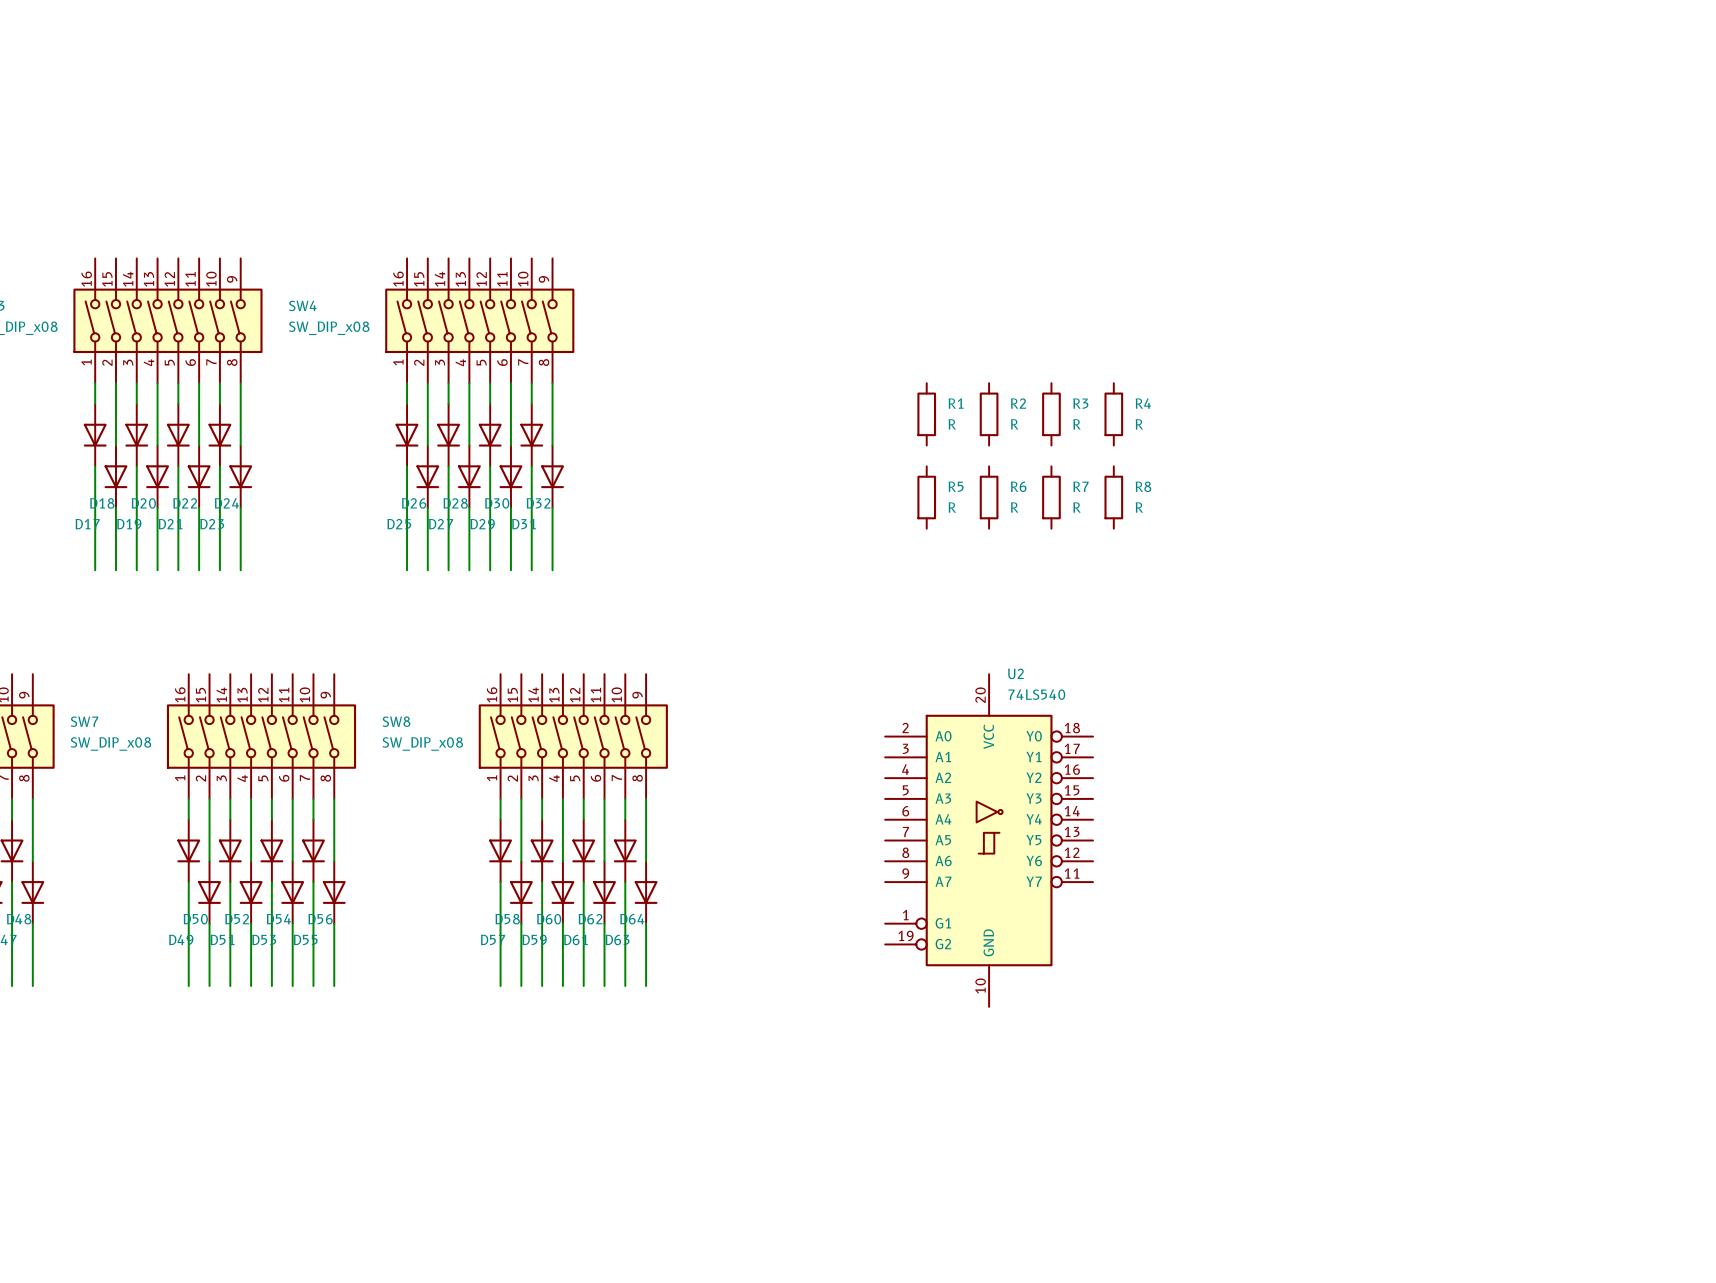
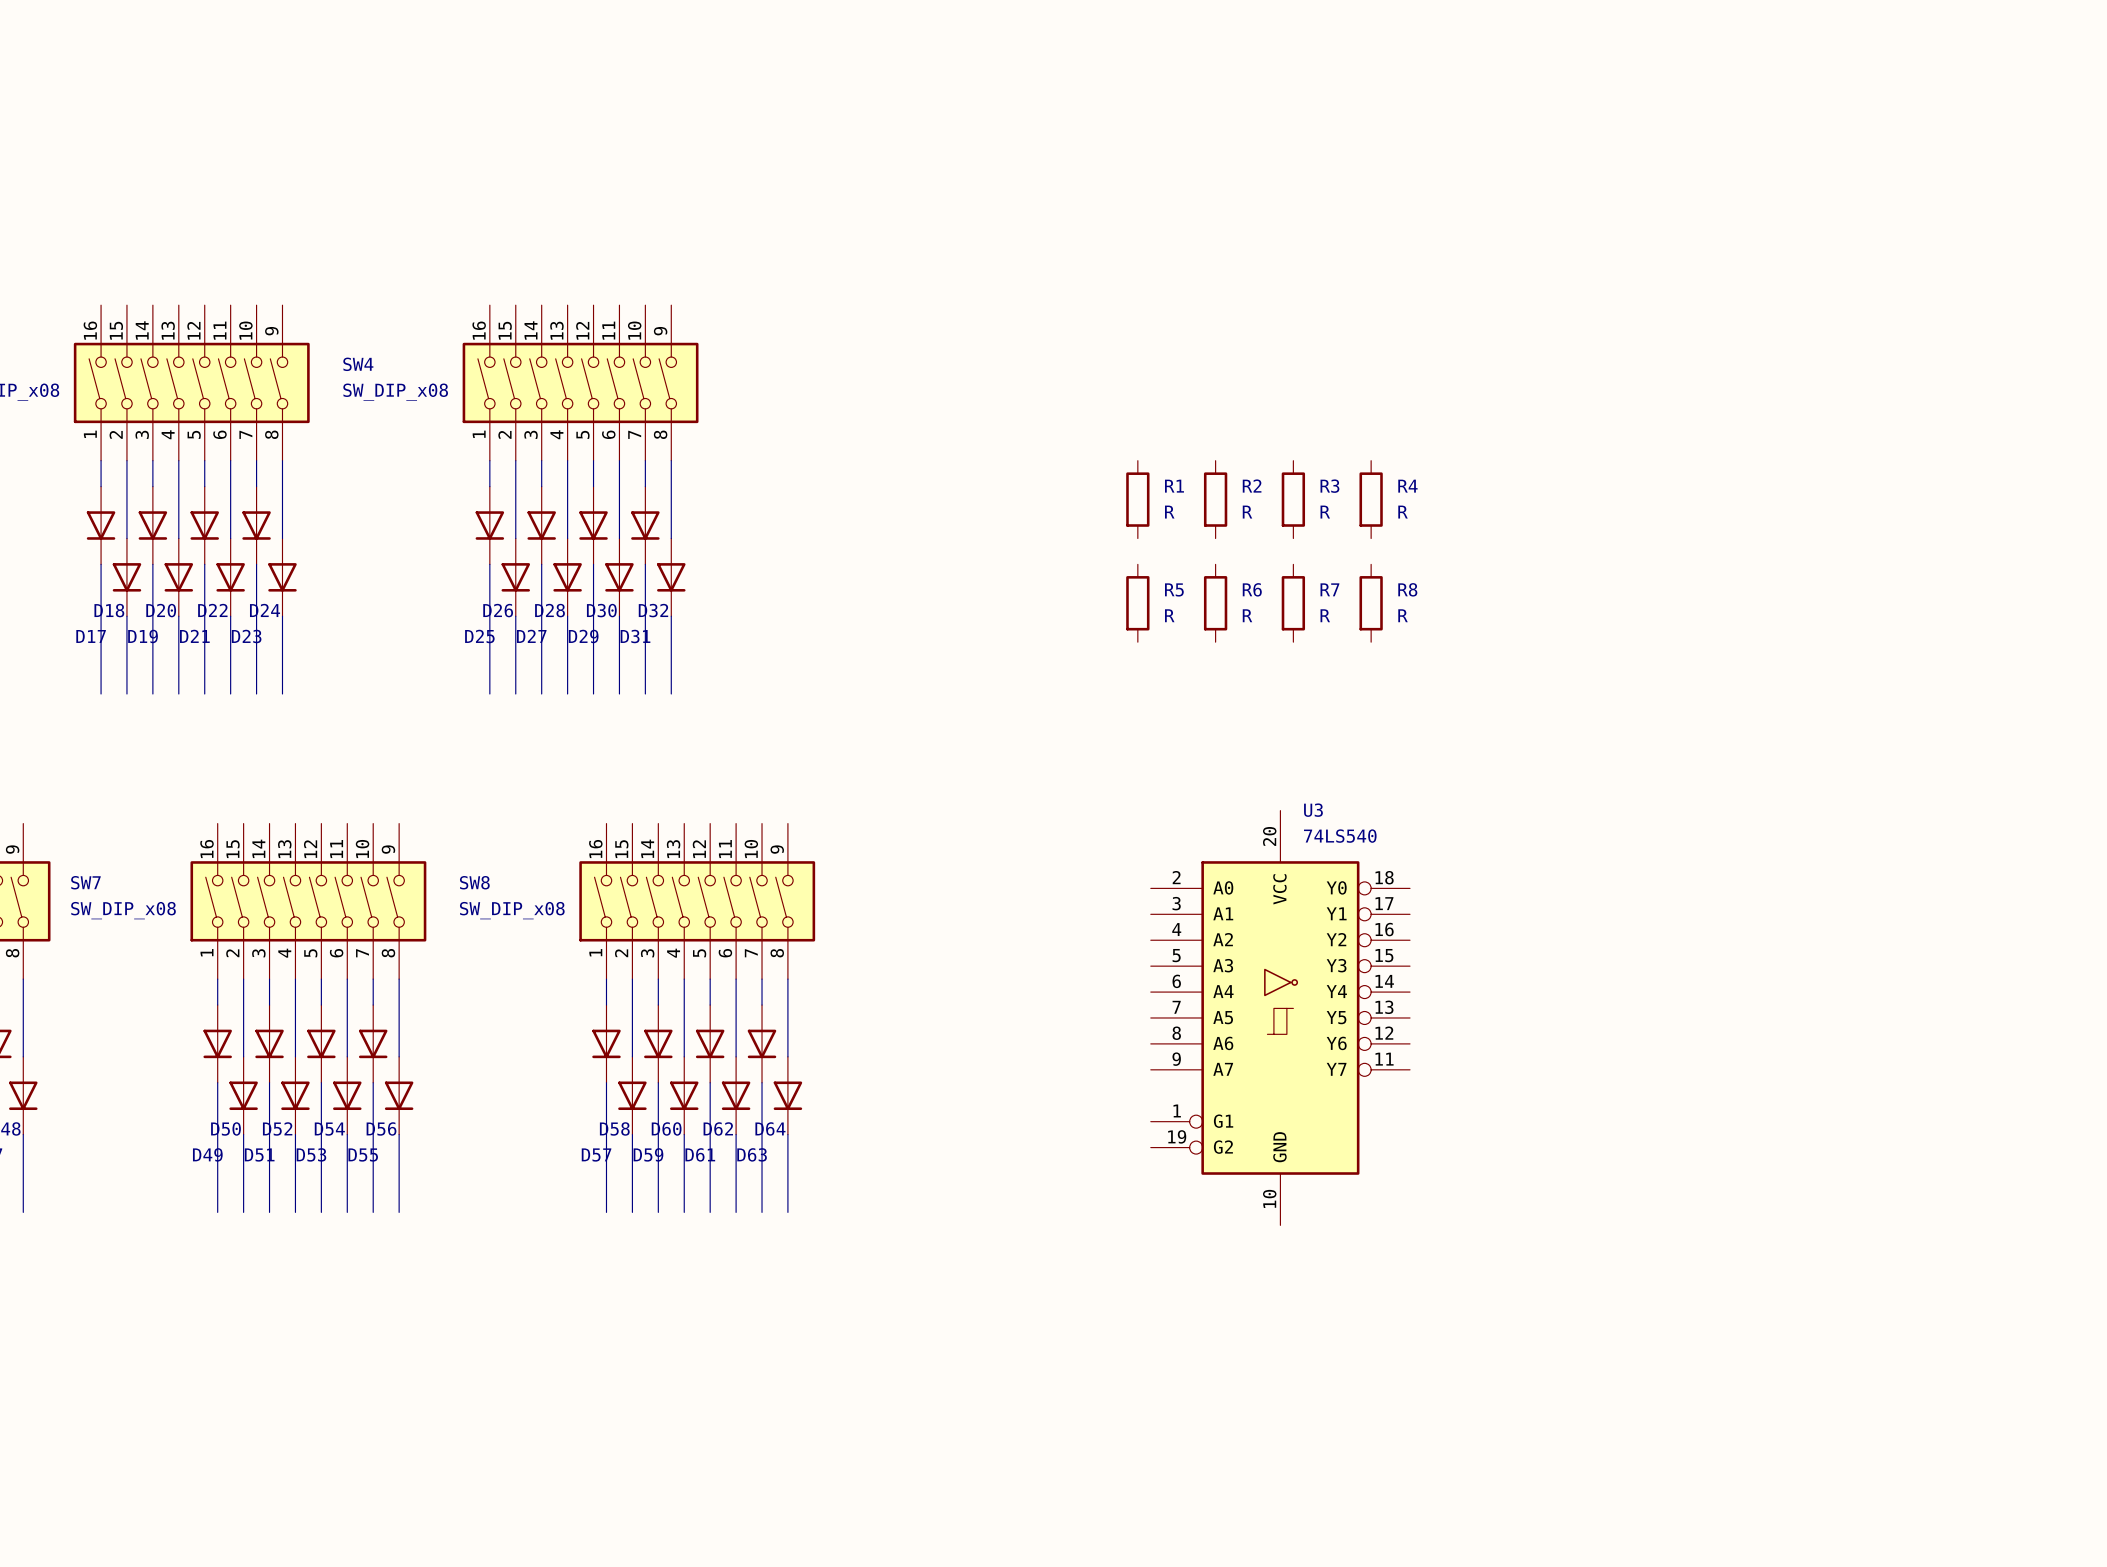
U3: none -> 74LS540 (1280, 1017)
U2: 74LS540 (989, 840) -> none

